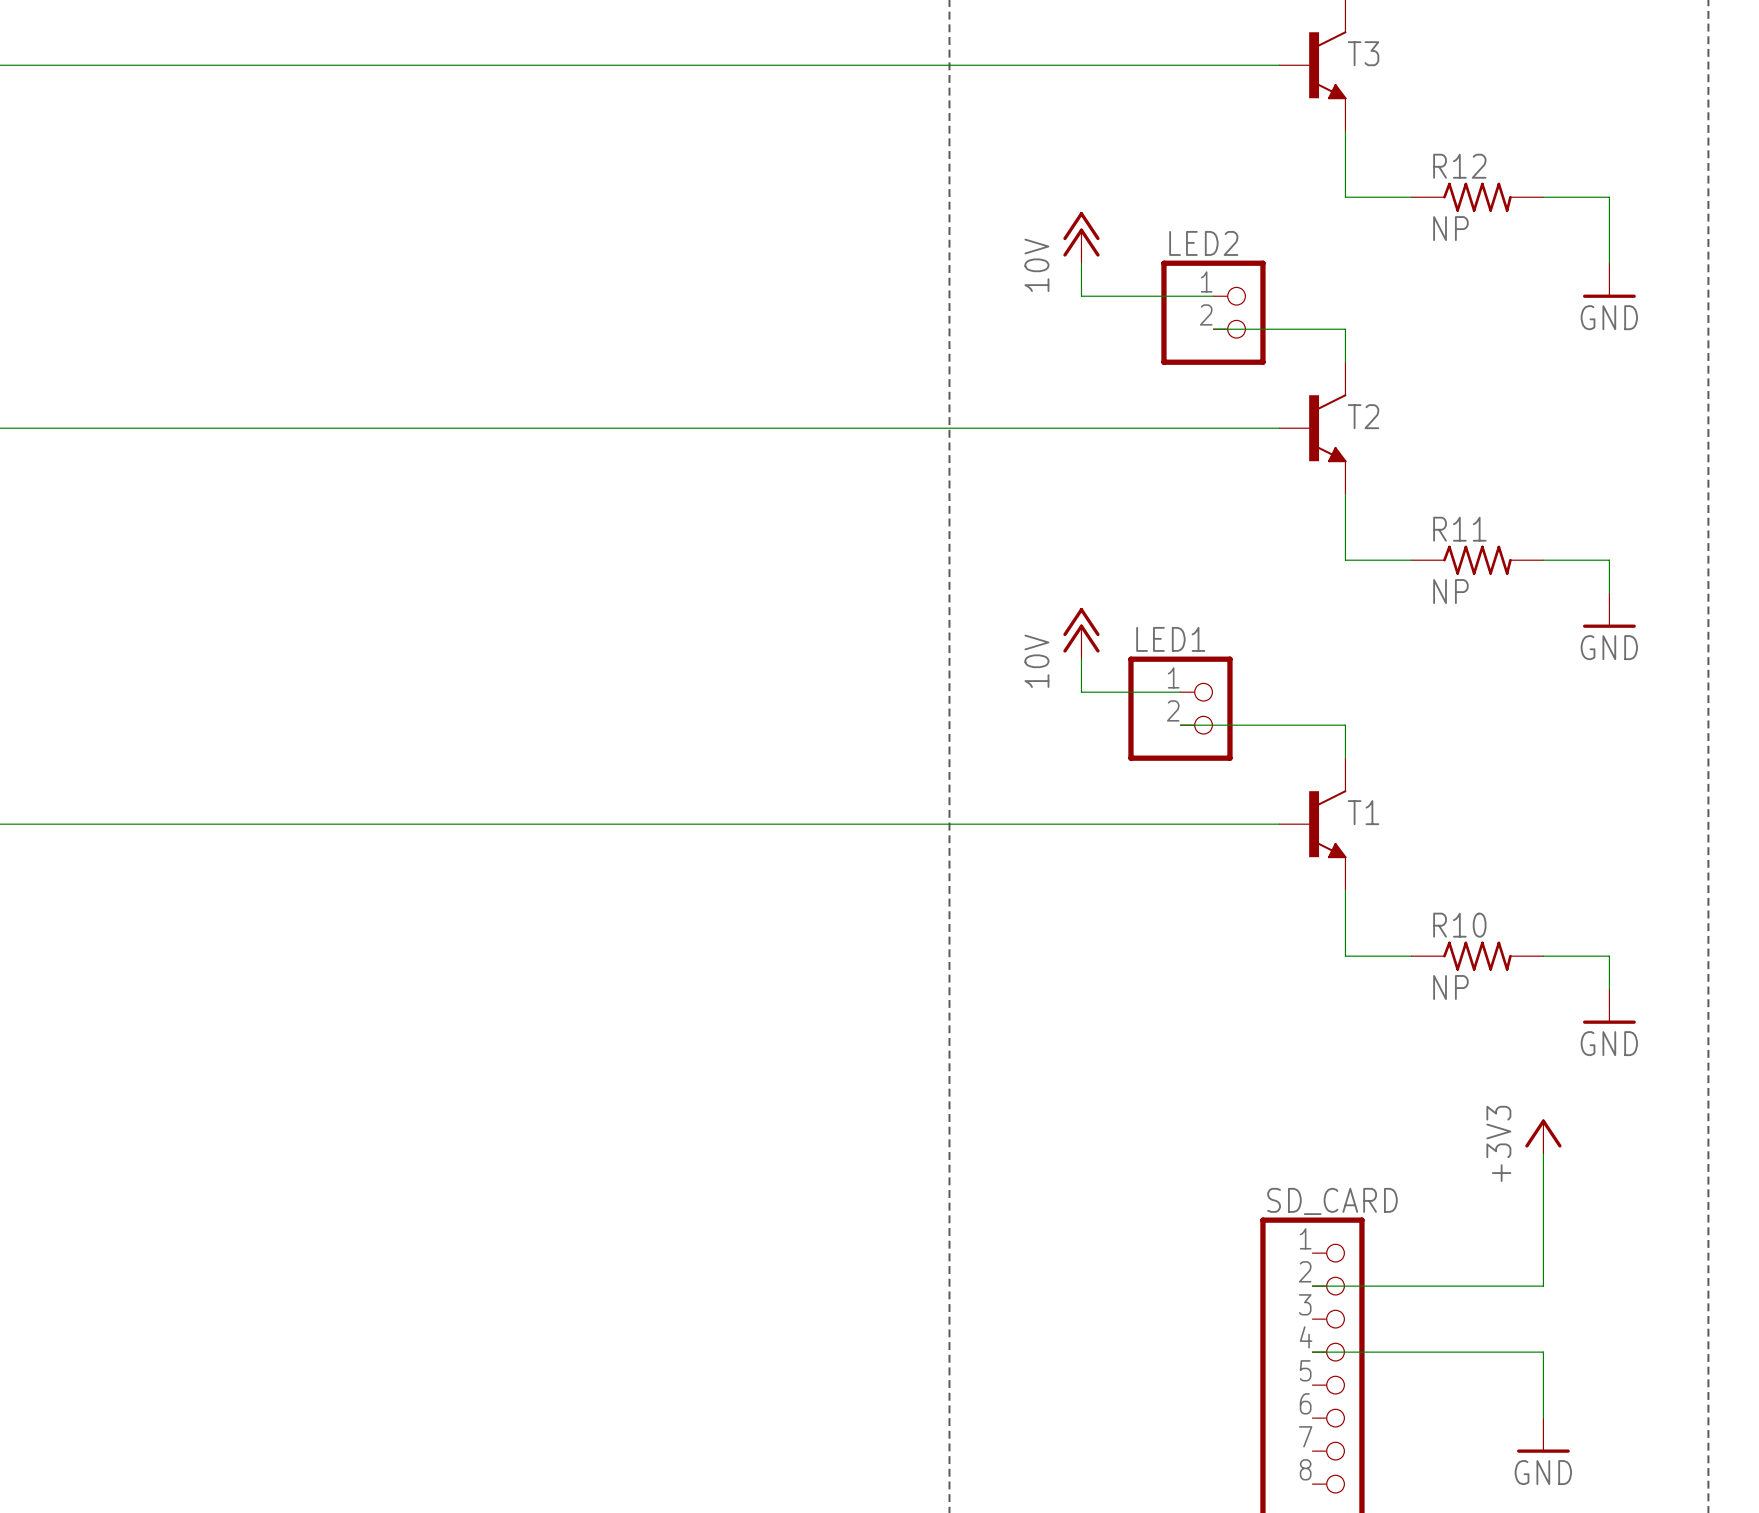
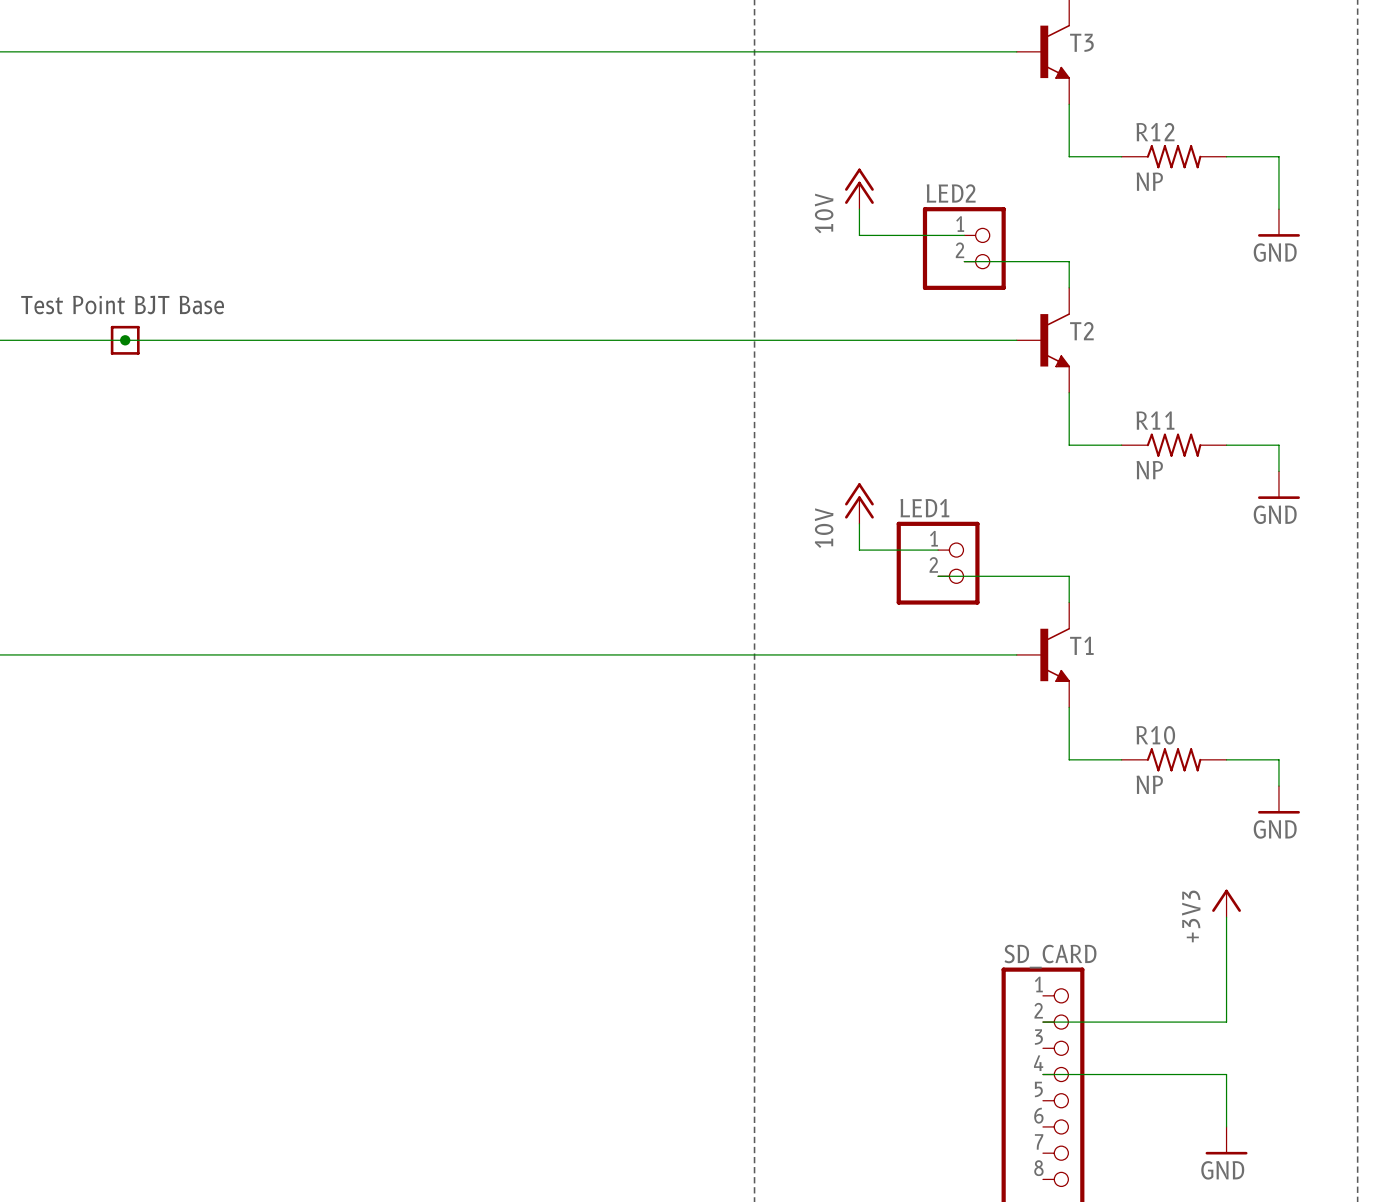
text: none -> Test Point BJT Base (122, 305)
part: none -> (125, 340)
junction: none -> (125, 340)

